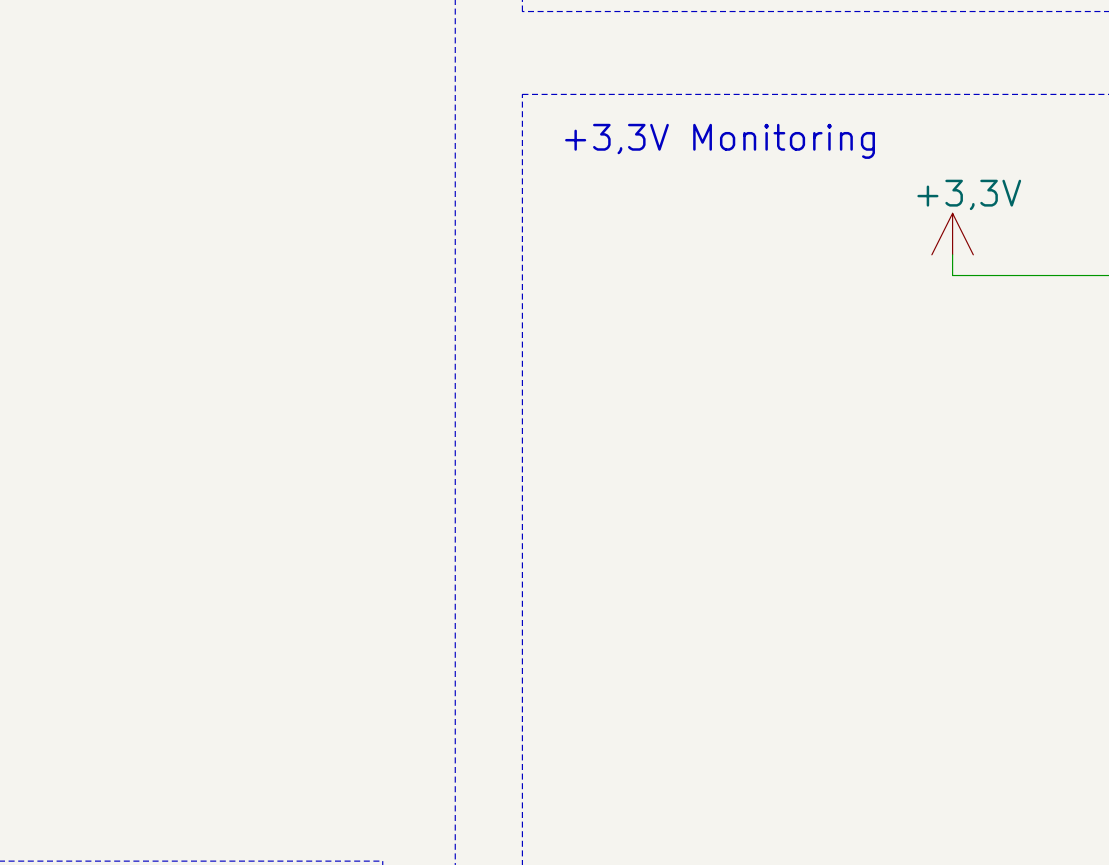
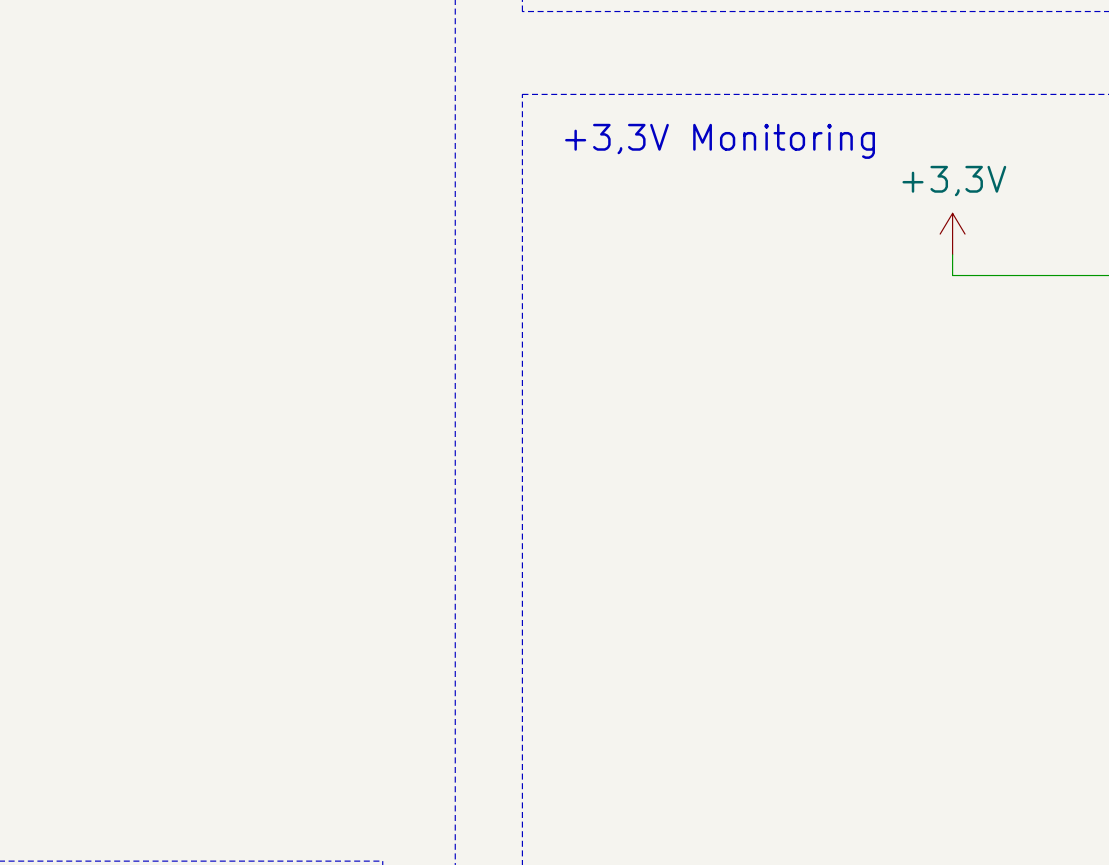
power symbol shape: [931, 213, 974, 255] -> [940, 213, 966, 255]

